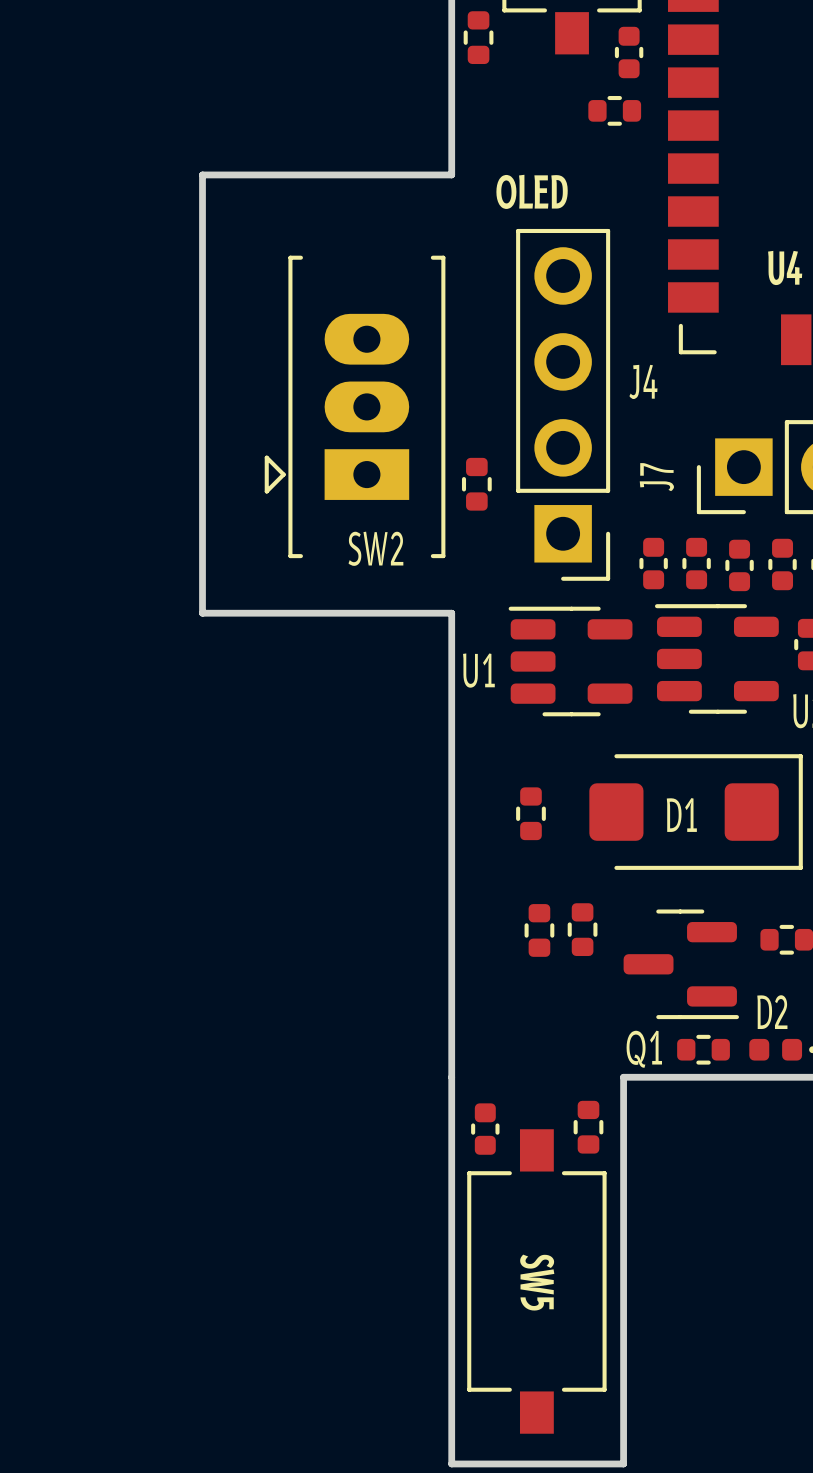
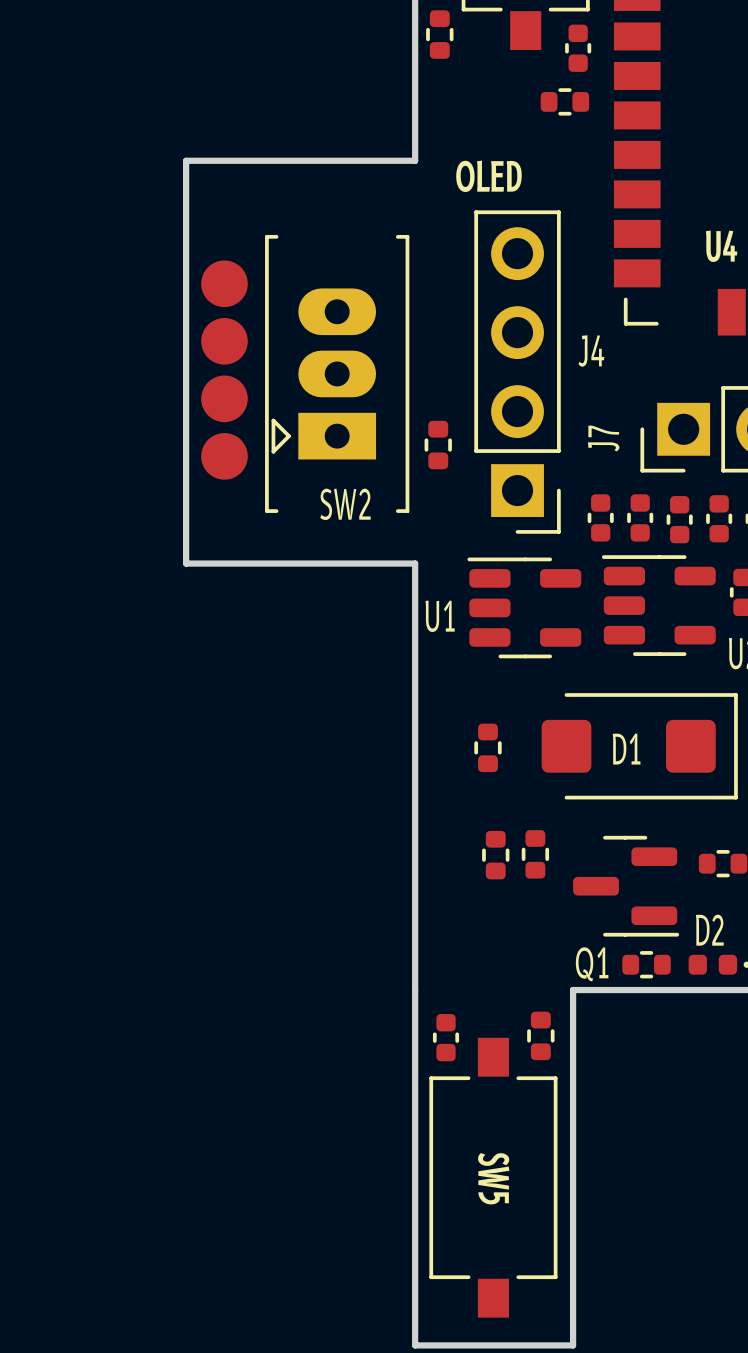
SW2 footprint: [264, 255, 446, 559] -> [265, 234, 410, 513]
part: none -> (224, 370)

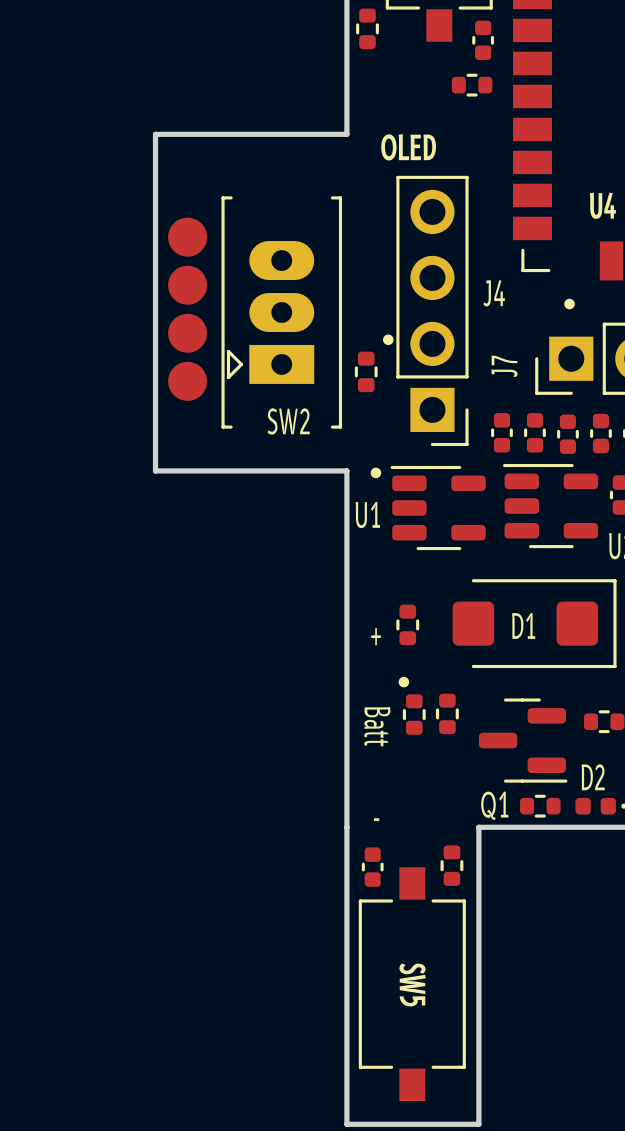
drawing: none -> [564, 298, 575, 310]
drawing: none -> [383, 334, 394, 346]
drawing: none -> [370, 467, 382, 479]
text: none -> + (376, 636)
drawing: none -> [398, 676, 410, 688]
text: none -> Batt (377, 726)
text: none -> - (376, 819)

